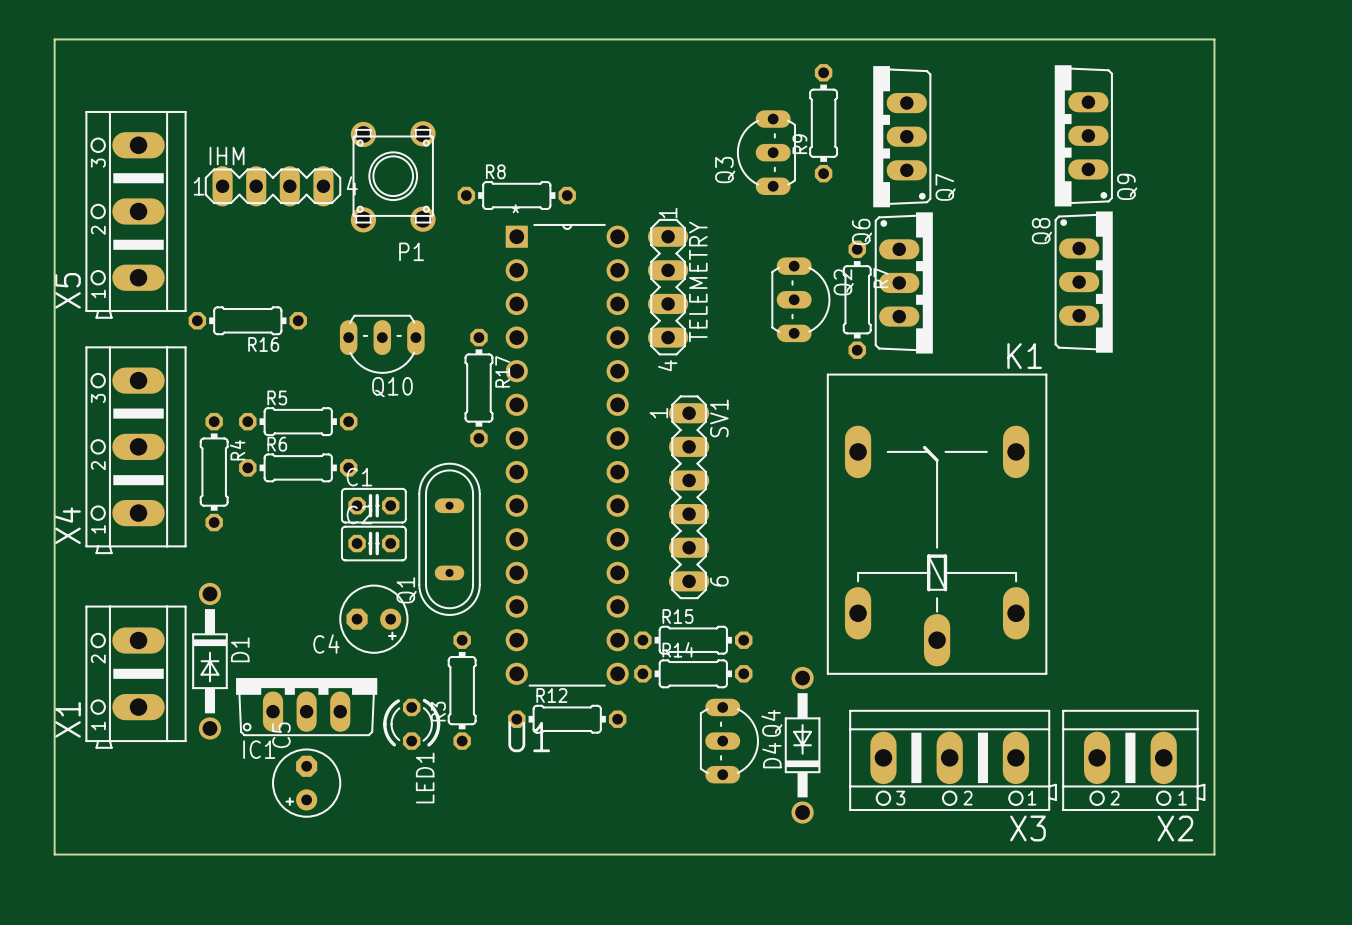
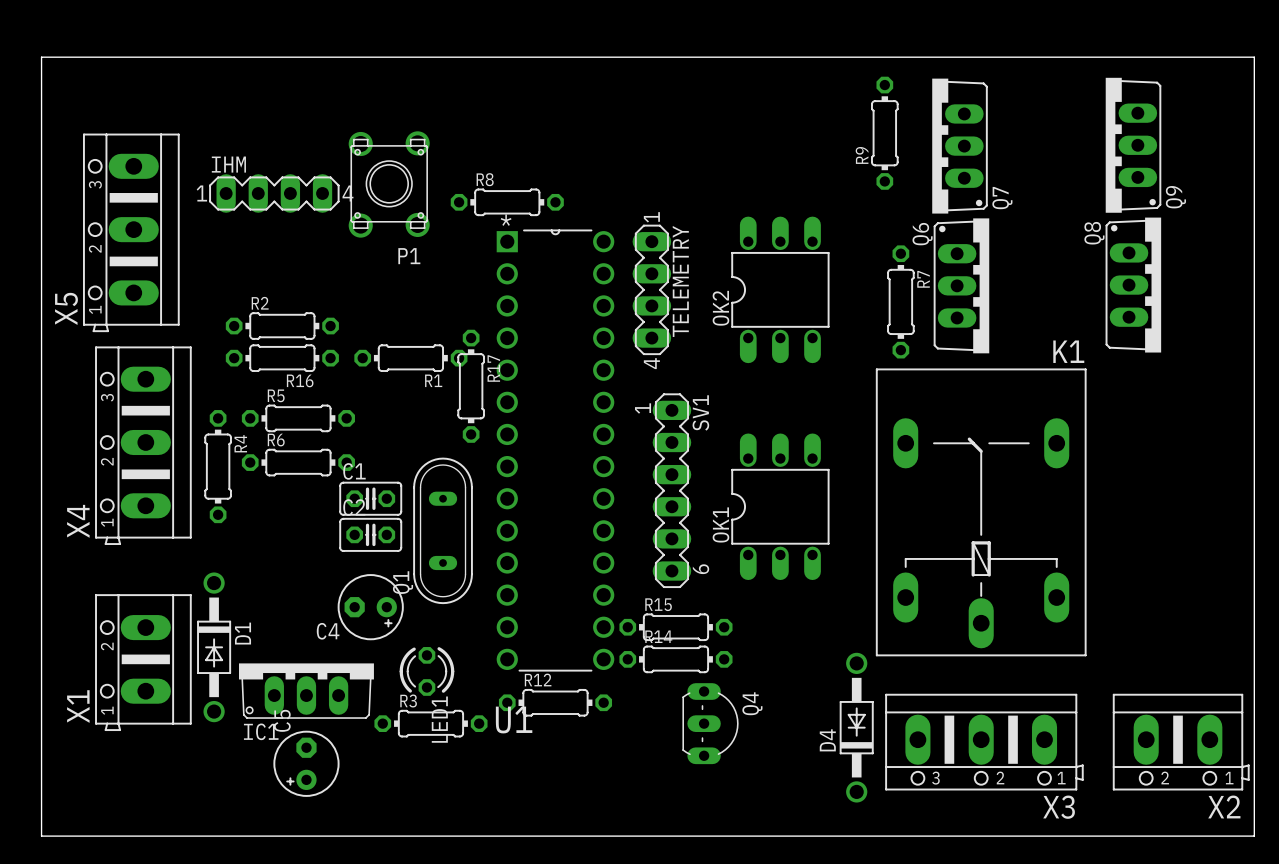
board edge: (54, 39) (1214, 39) (1214, 854) (54, 854) (54, 39) -> (41, 57) (41, 836) (1254, 836) (1254, 57) (41, 57)
R9 position: (823, 123) -> (884, 133)
Q9 position: (1083, 135) -> (1133, 145)
Q7 position: (902, 136) -> (960, 146)
Q3: (766, 152) -> none
X5 position: (136, 214) -> (131, 232)
Q6 position: (903, 282) -> (961, 285)
Q8 position: (1083, 282) -> (1133, 285)
OK2: none -> (780, 289)
Q2: (800, 299) -> none
R7 position: (857, 299) -> (900, 301)
R16 position: (247, 320) -> (282, 358)
R2: none -> (282, 326)
Q10: (382, 344) -> none
R1: none -> (410, 358)
K1 footprint: [826, 373, 1048, 675] -> [875, 368, 1087, 657]
OK1: none -> (780, 506)
R3 rotation: 0° (462, 690) -> 90° clockwise (430, 723)
LED1 position: (411, 724) -> (426, 671)
D4 position: (802, 745) -> (856, 727)
X3 position: (953, 760) -> (984, 742)
X2 position: (1133, 760) -> (1181, 742)

